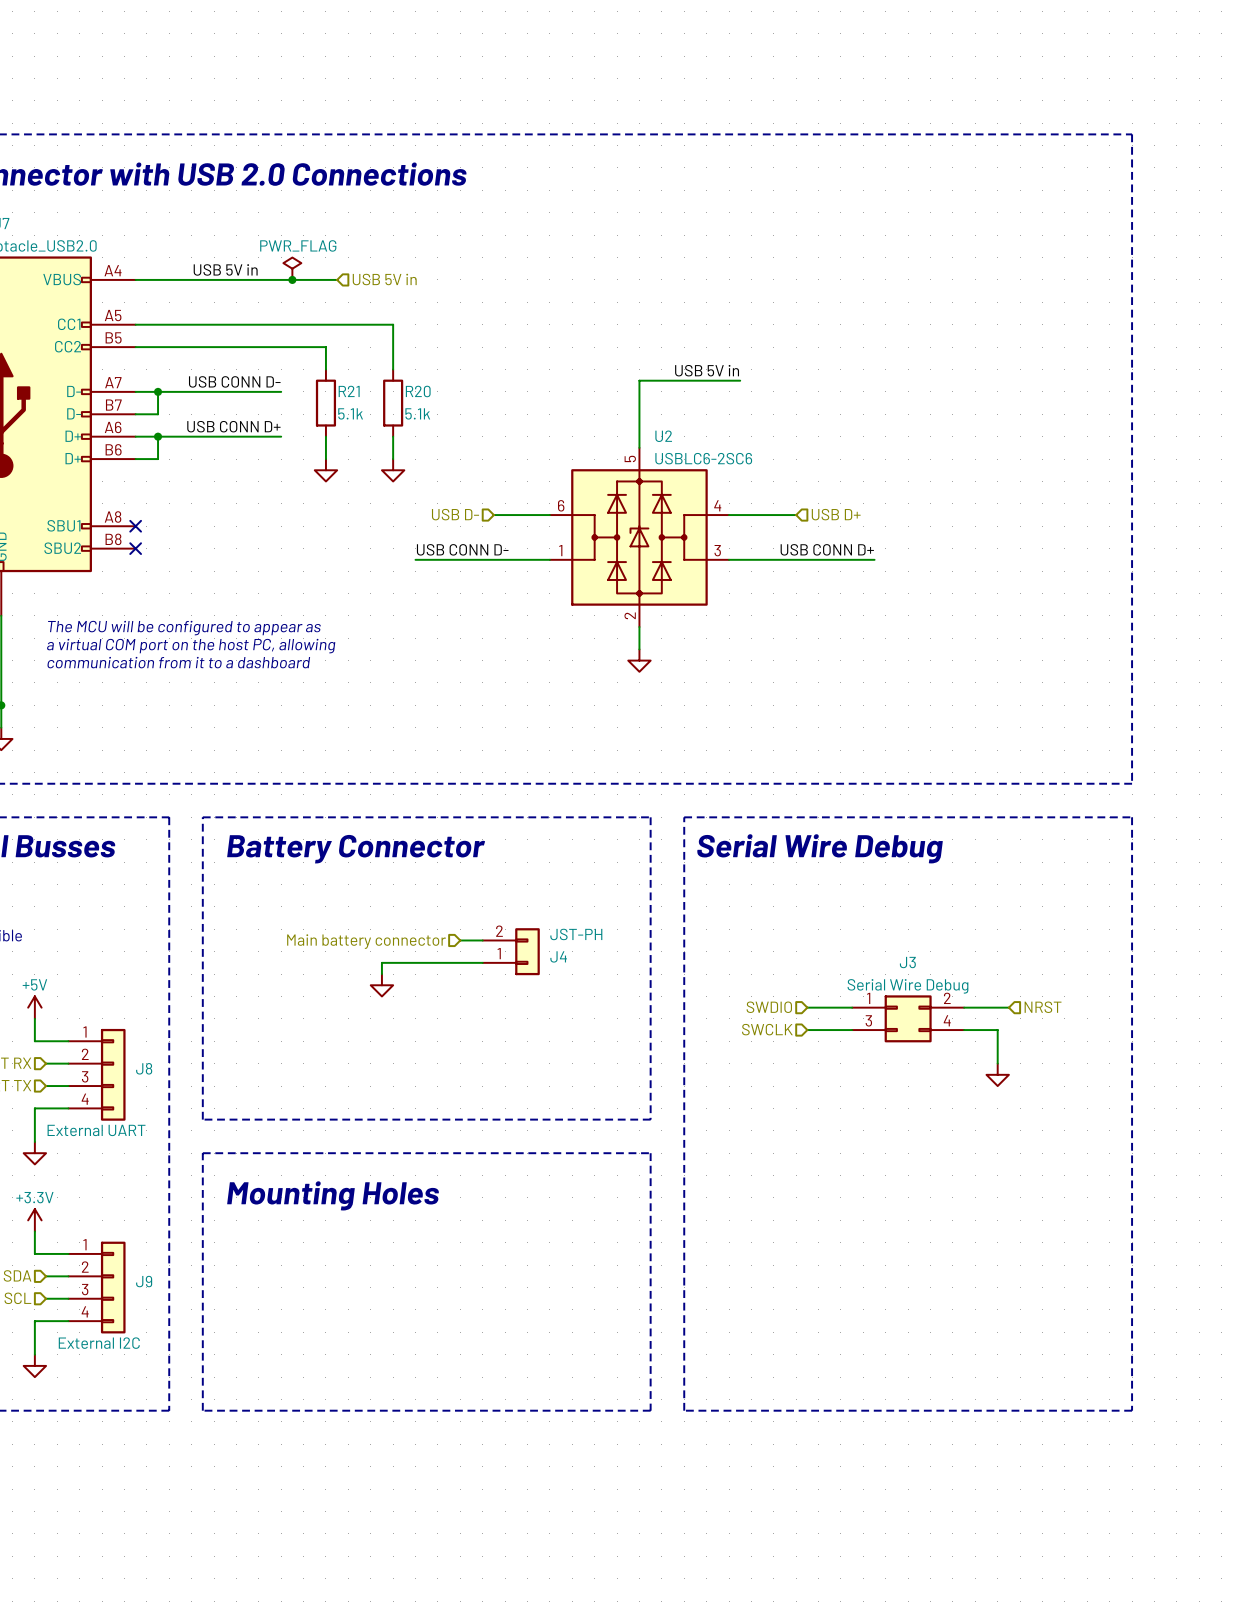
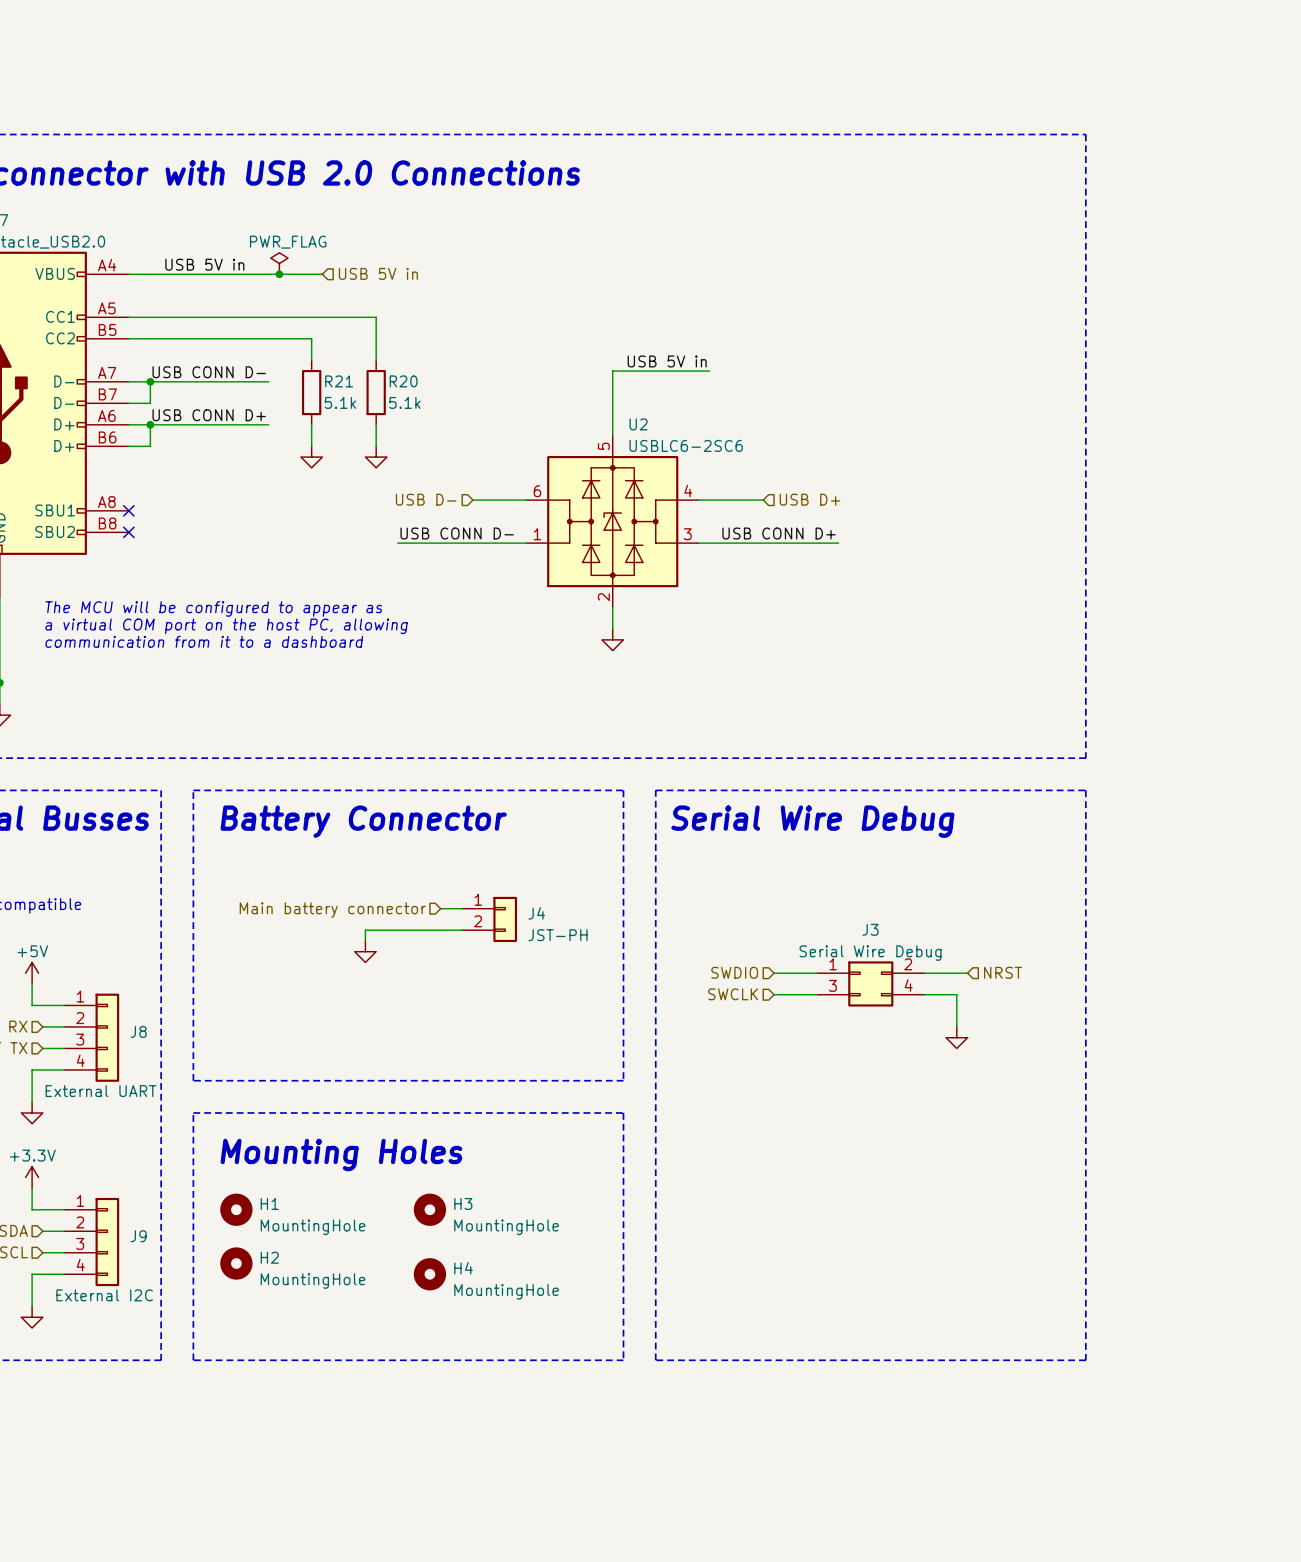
J4 flip: as is (527, 951) -> up-down (505, 919)
H1: none -> MountingHole (236, 1209)
H3: none -> MountingHole (429, 1209)
H2: none -> MountingHole (236, 1263)
H4: none -> MountingHole (429, 1274)

